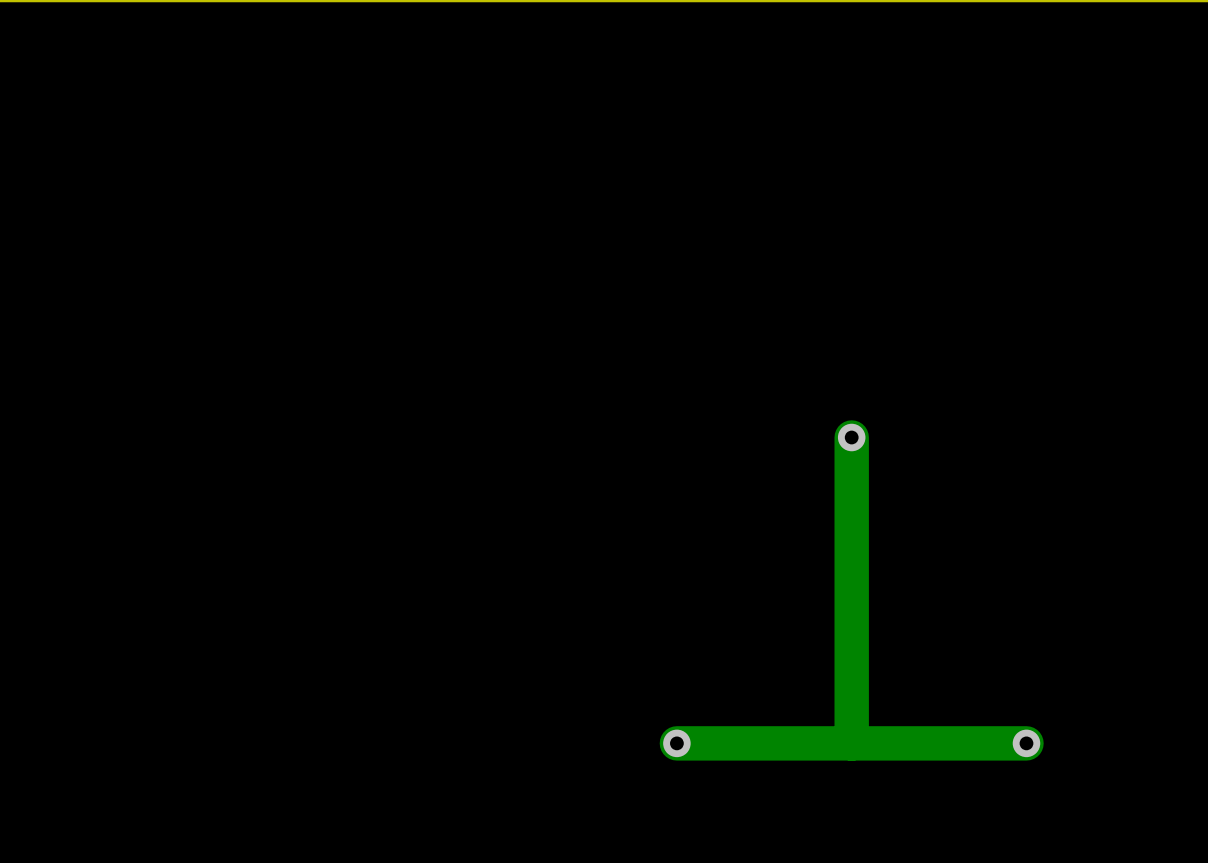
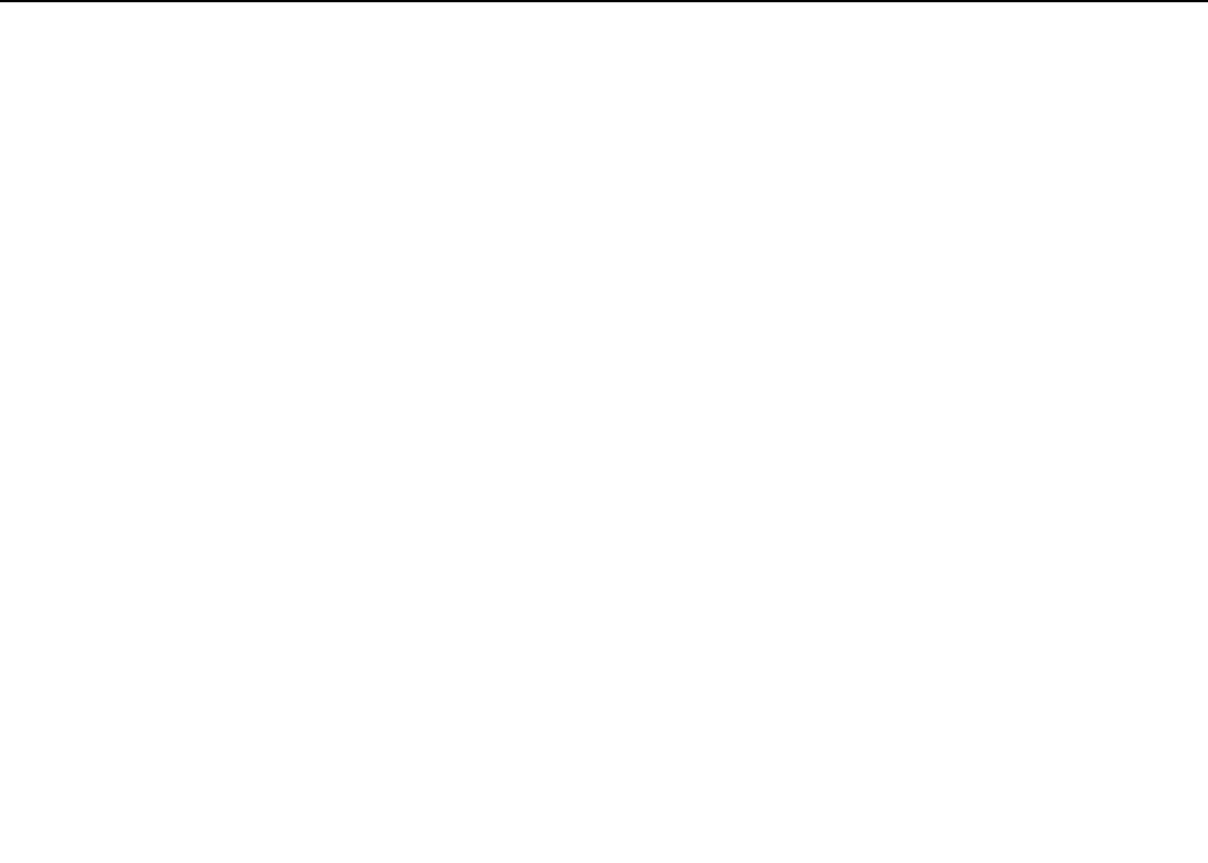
track: (851, 437) (851, 743) -> none
via: (851, 437) -> none
via: (676, 743) -> none
track: (1026, 743) (676, 743) -> none
via: (1026, 743) -> none

